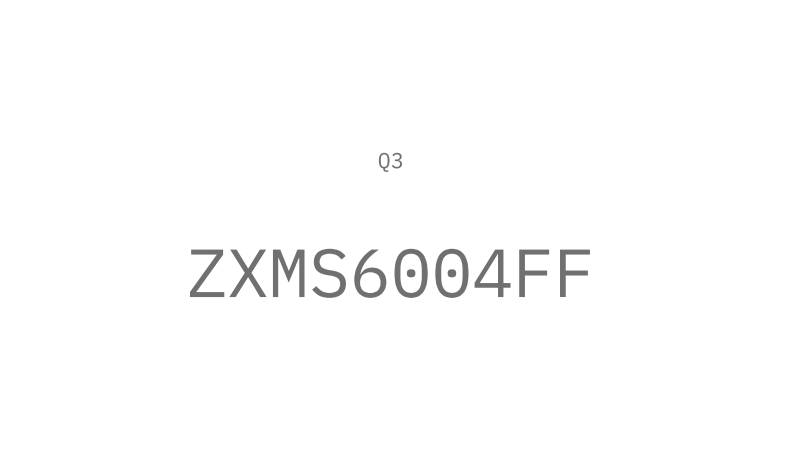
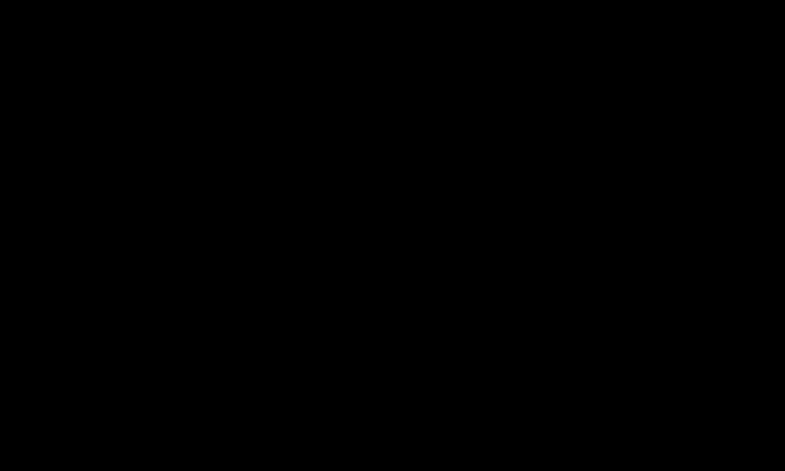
text: Q3 (390, 162) -> none
text: ZXMS6004FF (389, 273) -> none

